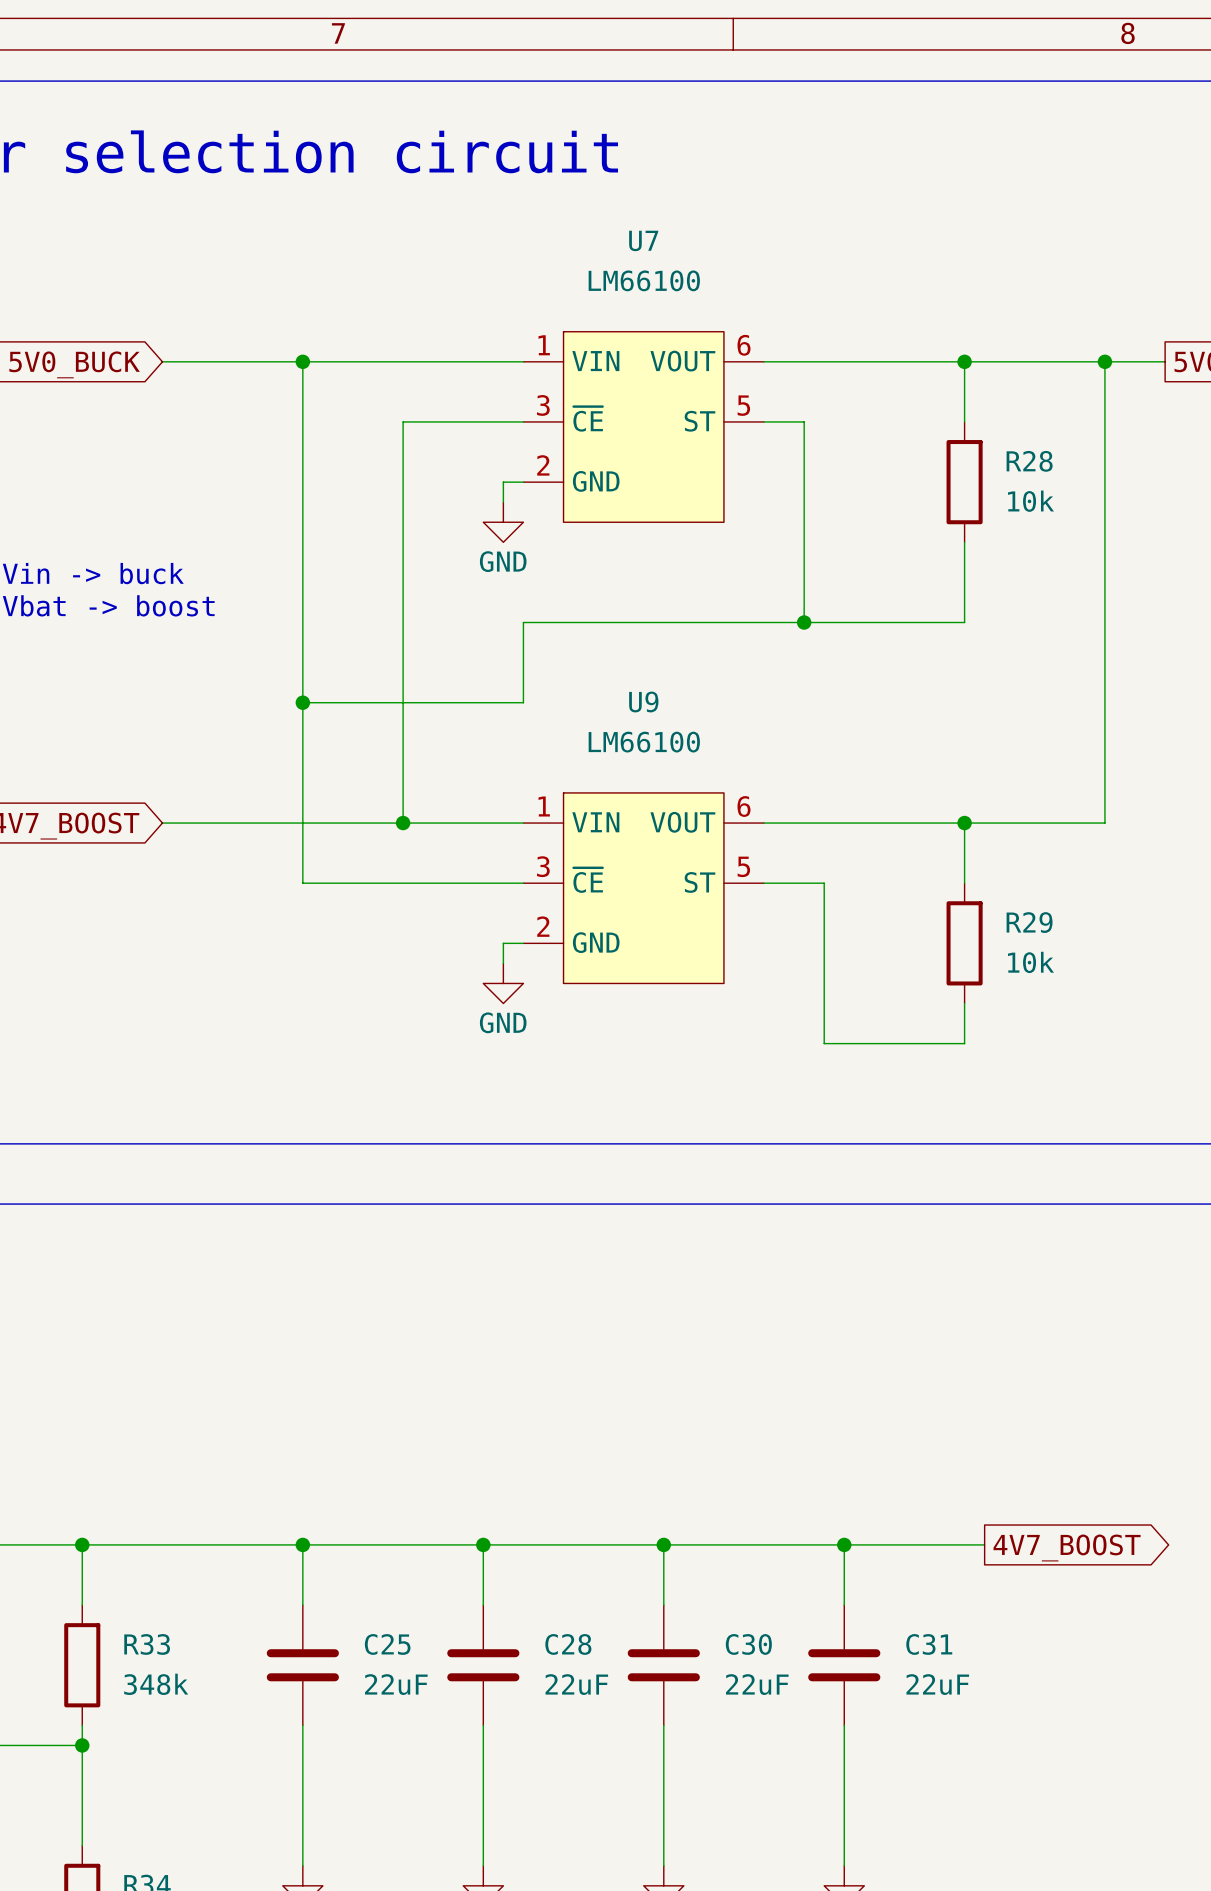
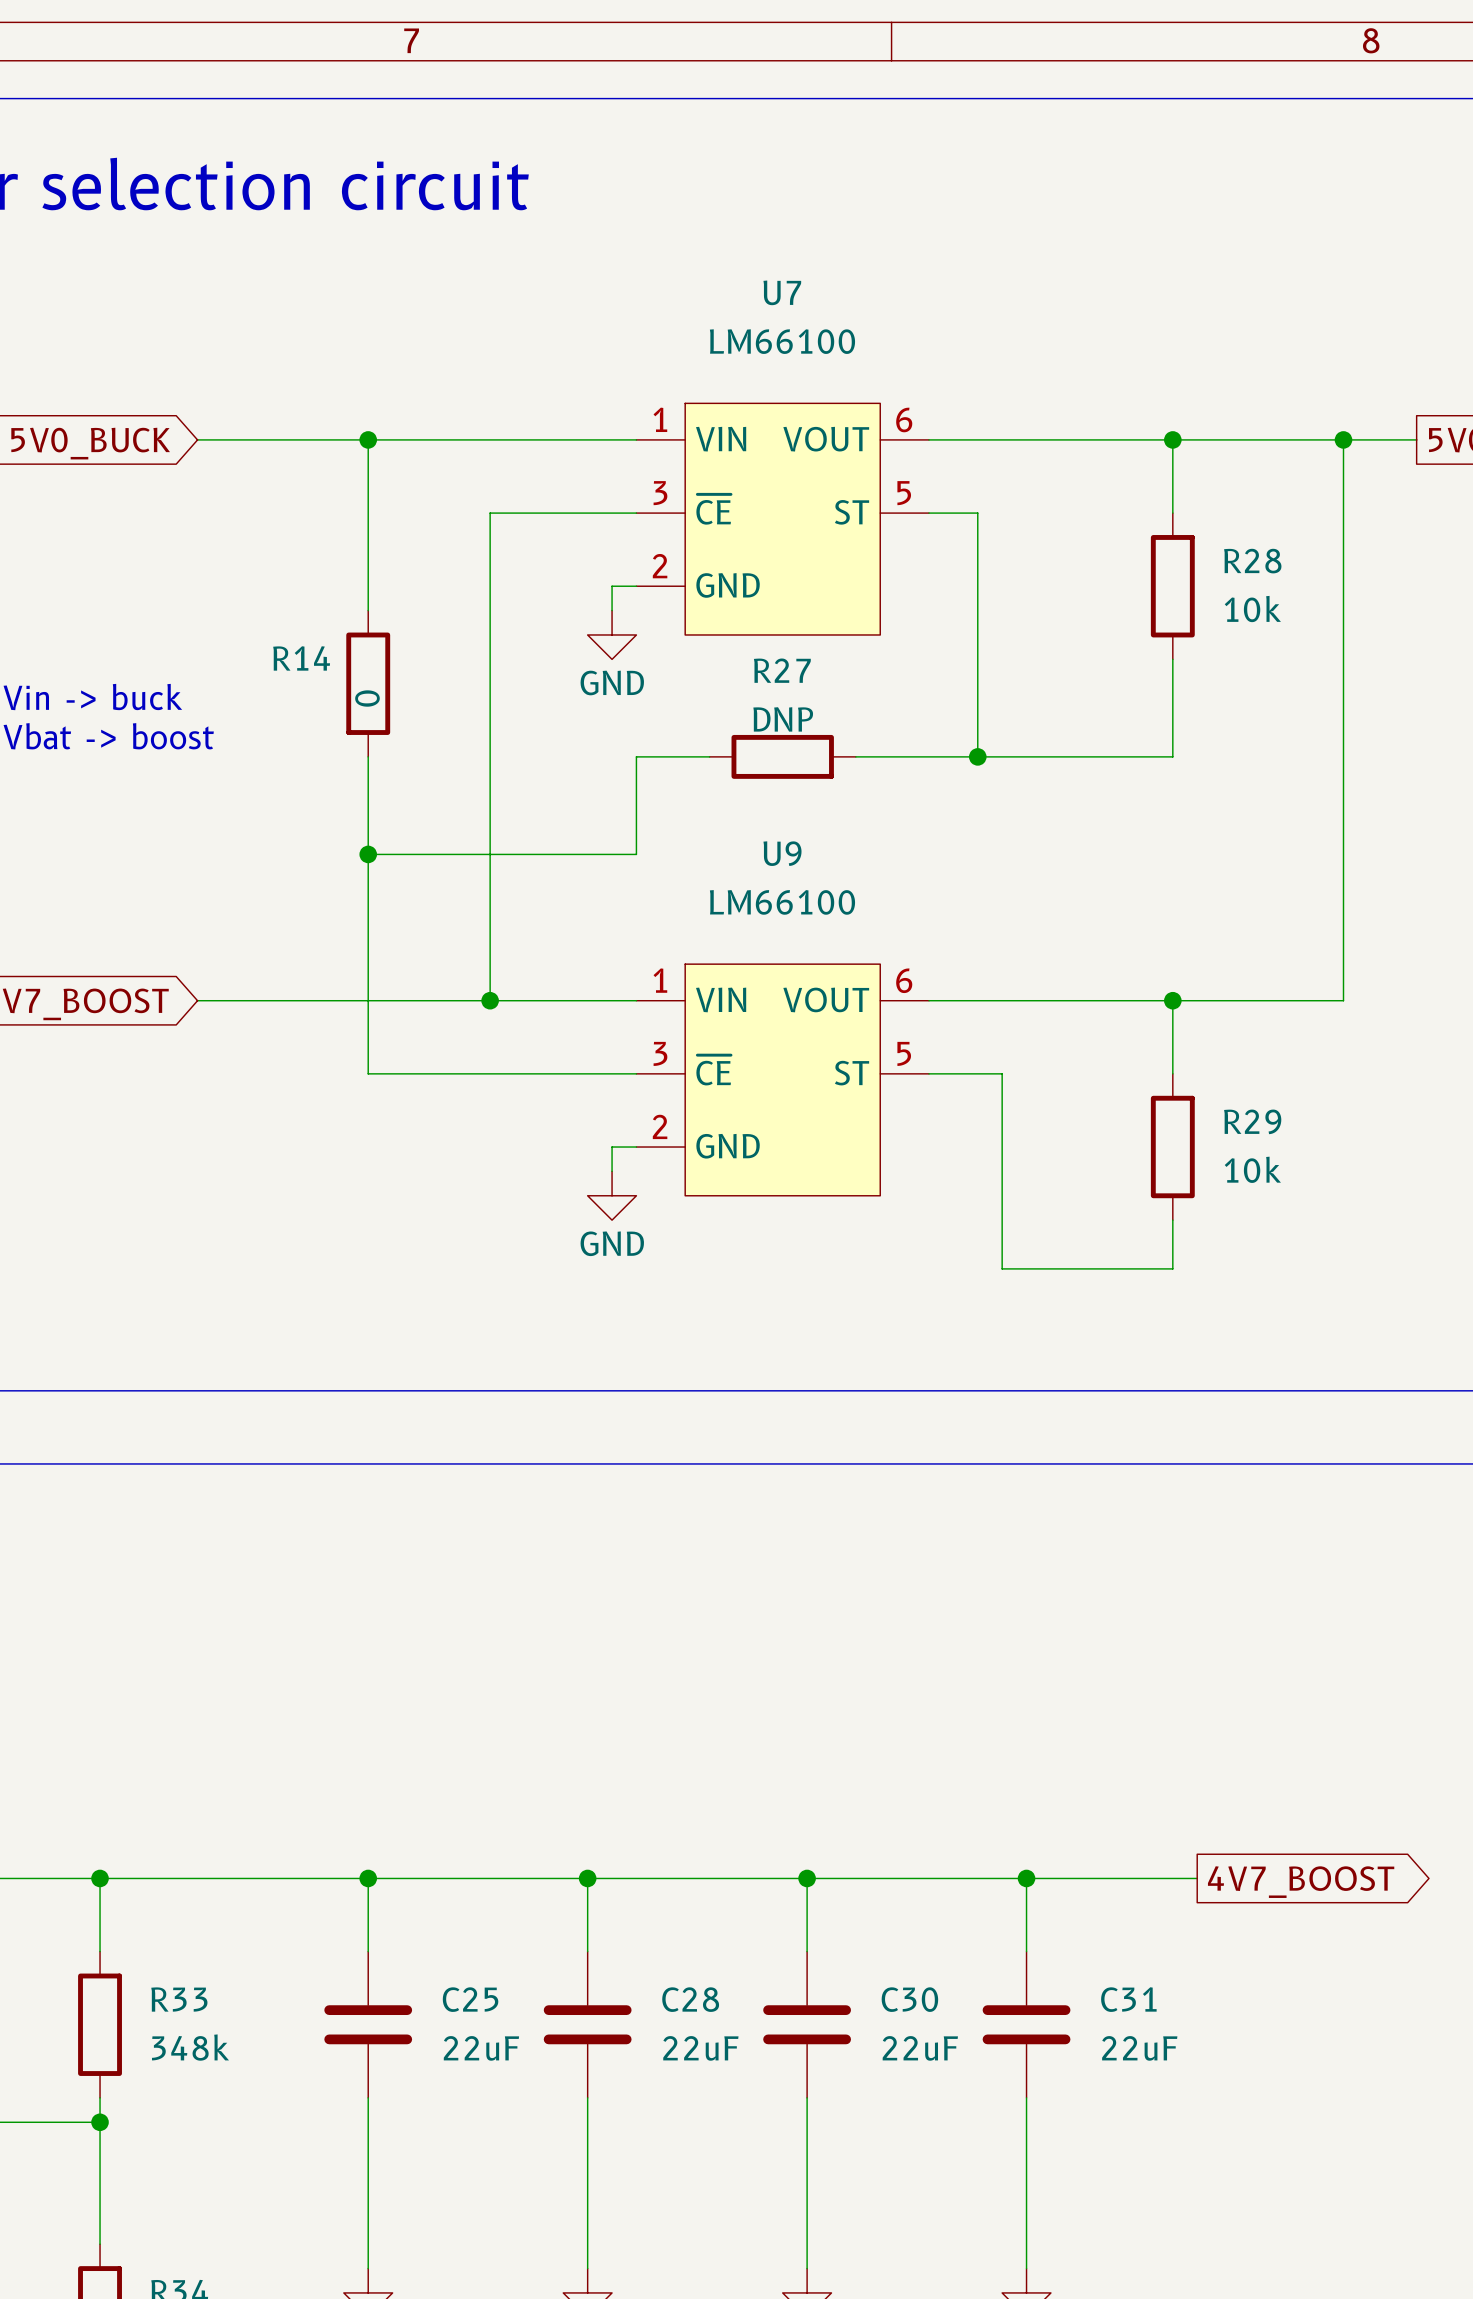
wire: (302, 502) (302, 622) -> none
R14: none -> 0 (368, 683)
wire: (583, 622) (703, 622) -> none
R27: none -> DNP (782, 756)

